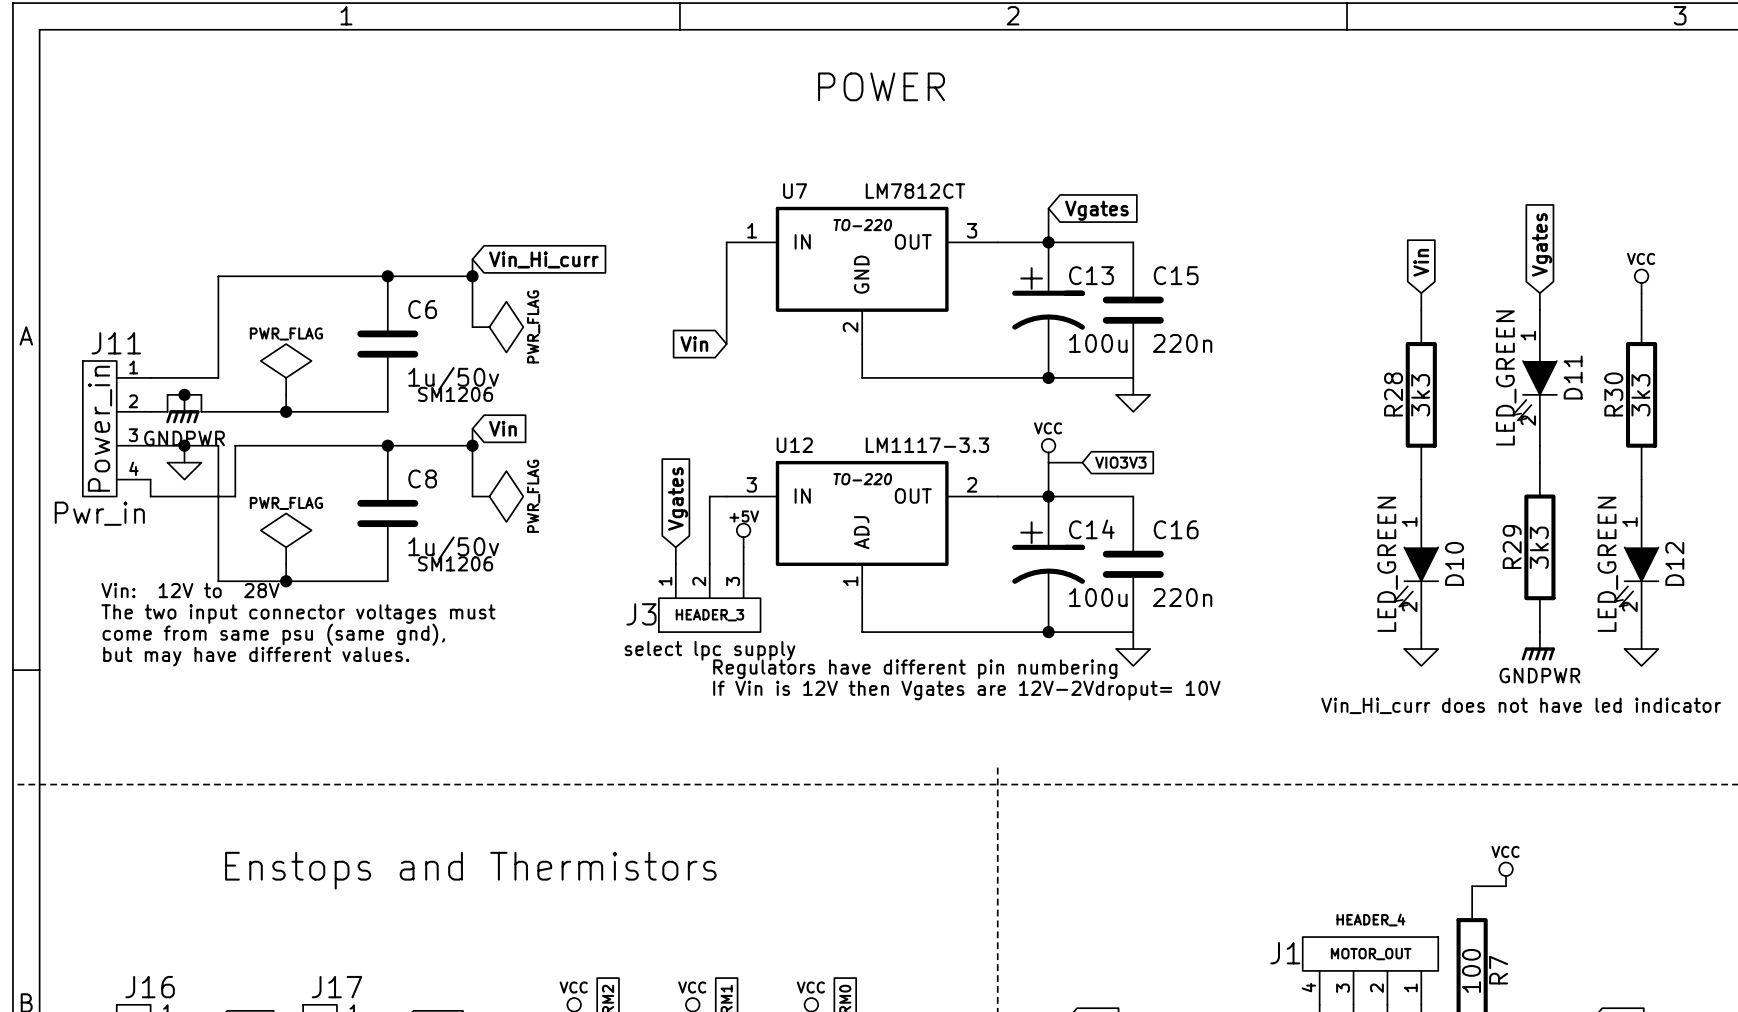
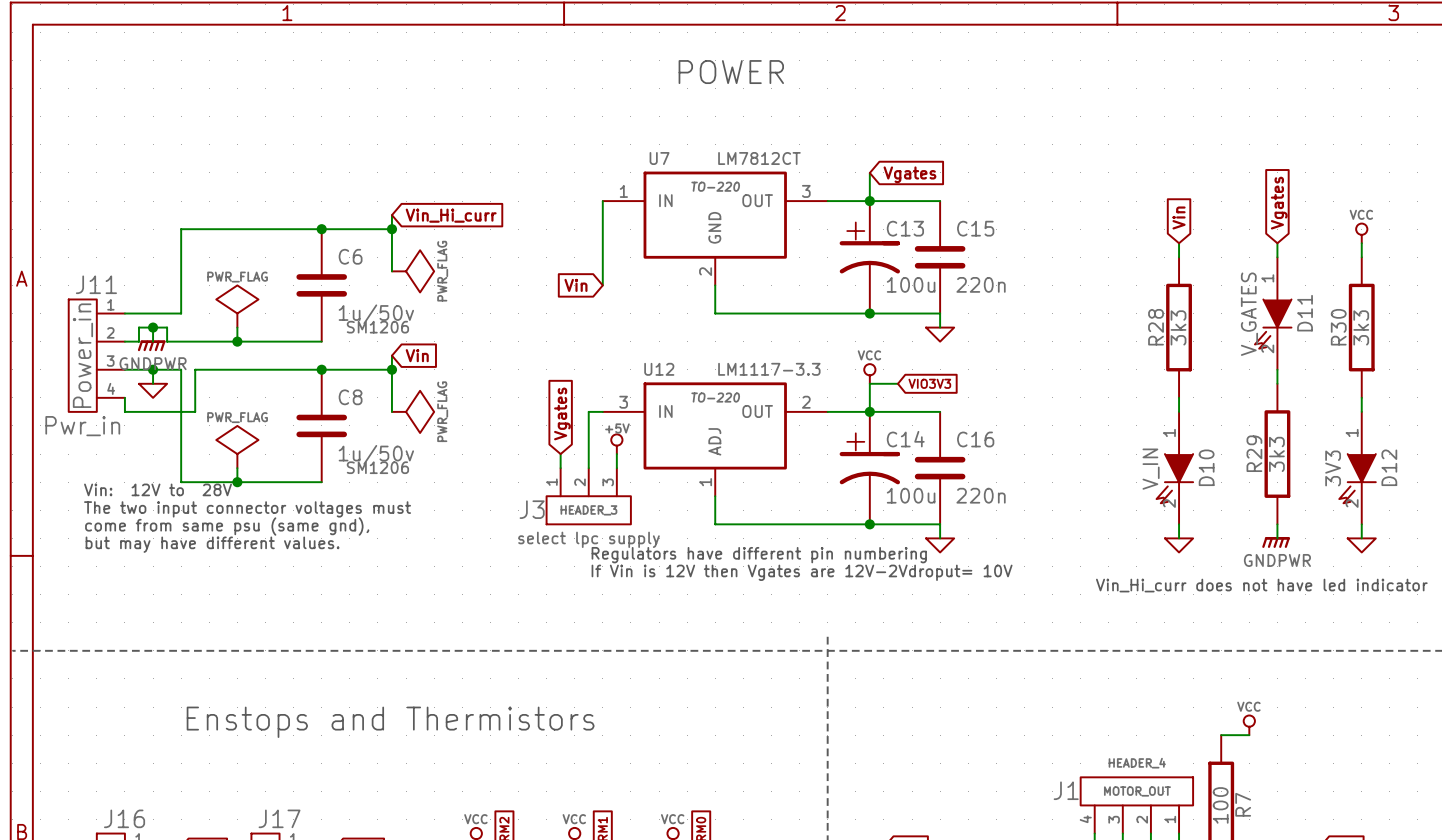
D11 value: LED_GREEN (1506, 377) -> V_GATES (1249, 314)
D10 value: LED_GREEN (1387, 564) -> V_IN (1151, 469)
D12 value: LED_GREEN (1607, 564) -> 3V3 (1333, 468)

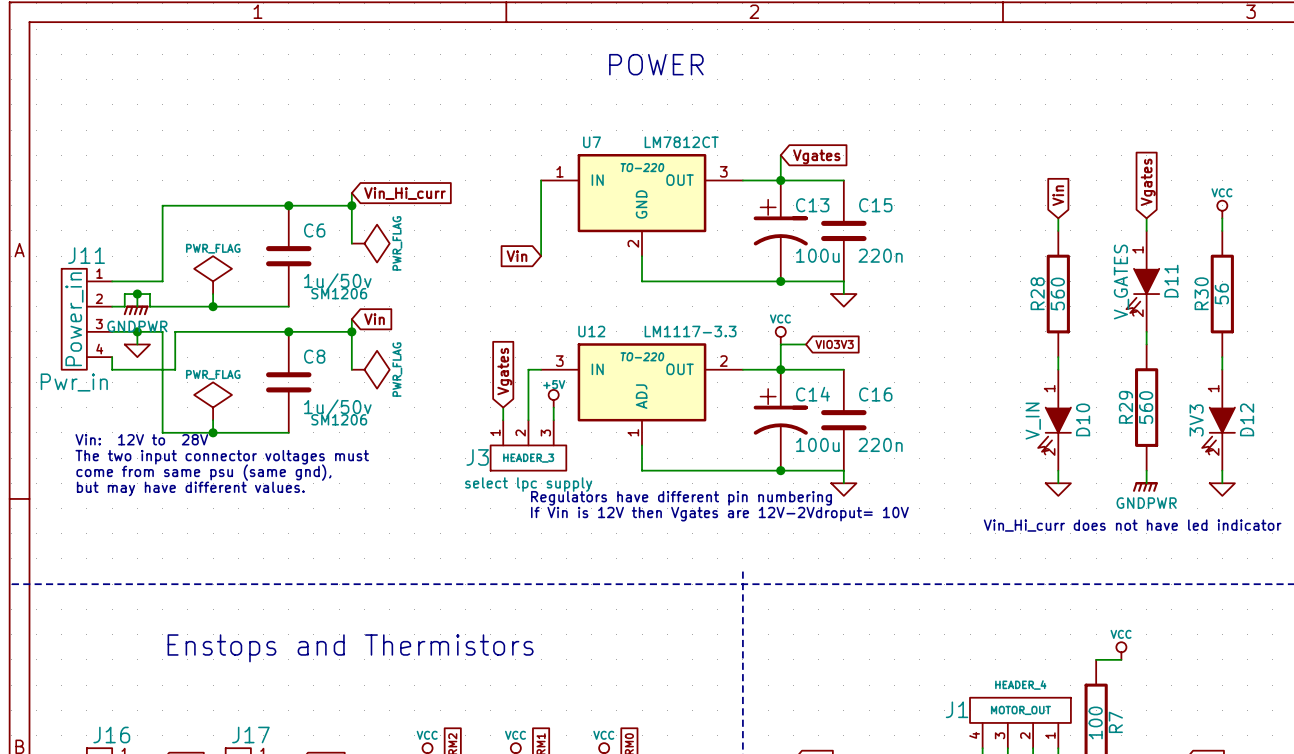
R28 value: 3k3 (1178, 327) -> 560 (1057, 294)
R30 value: 3k3 (1361, 327) -> 56 (1221, 294)
R29 value: 3k3 (1276, 454) -> 560 (1146, 407)

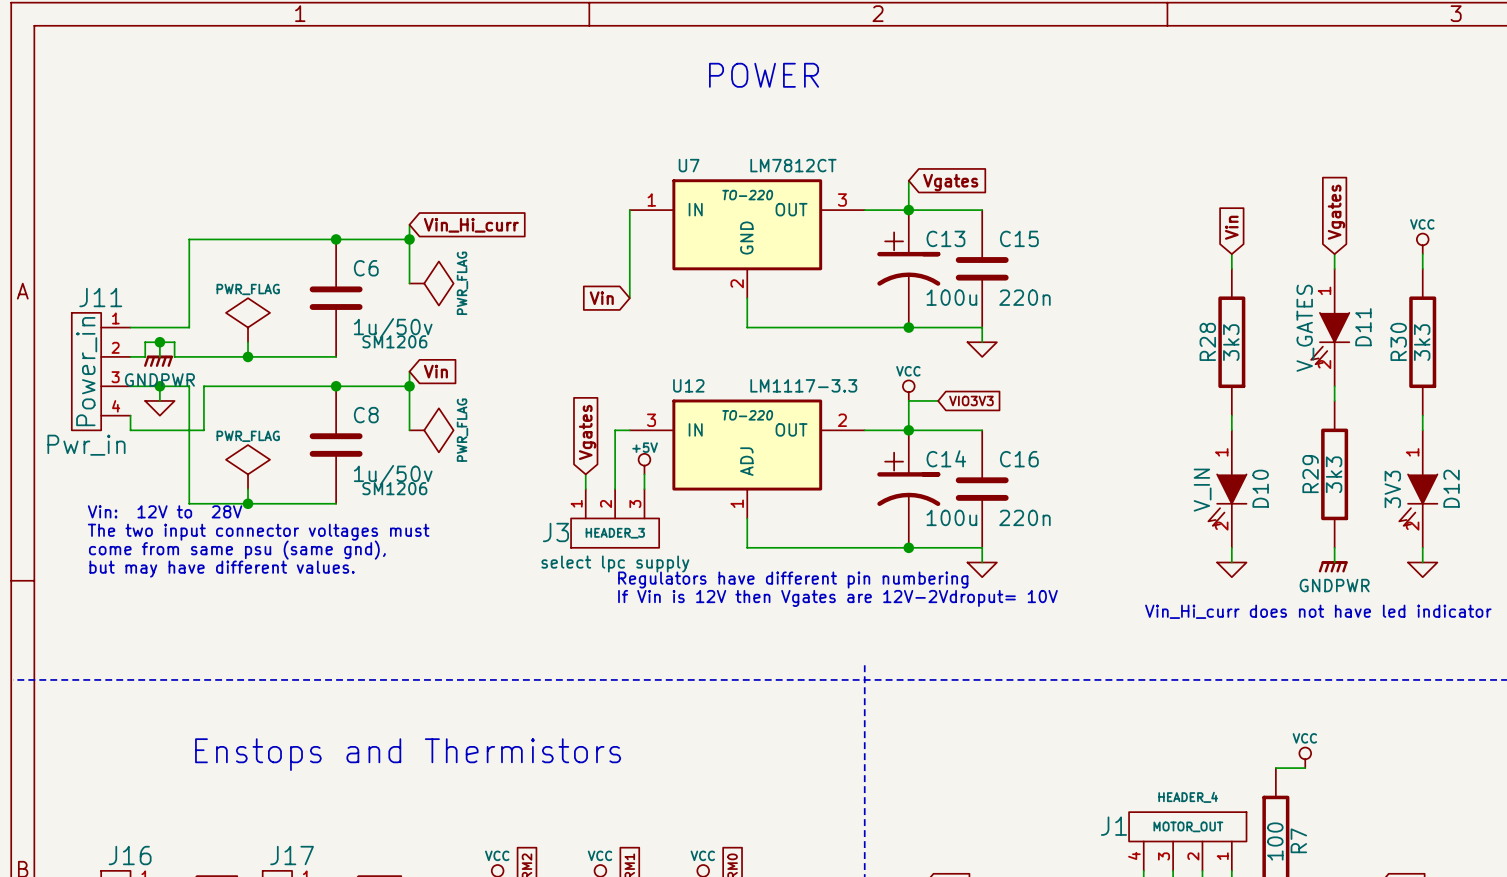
R28 value: 560 (1057, 294) -> 3k3 (1231, 342)
R30 value: 56 (1221, 294) -> 3k3 (1422, 342)
R29 value: 560 (1146, 407) -> 3k3 (1334, 474)

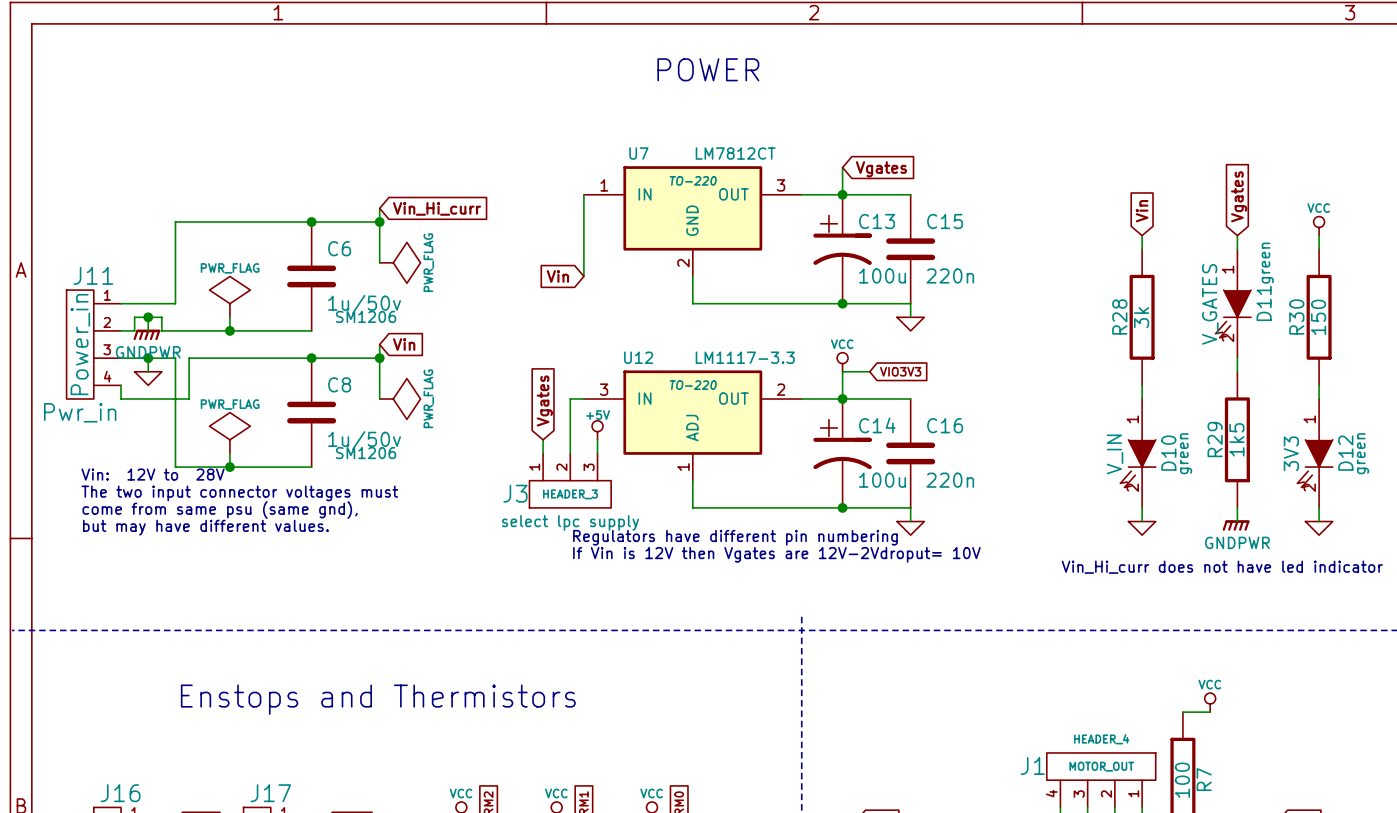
D11 text: none -> green (1267, 263)
R28 value: 3k3 (1231, 342) -> 3k (1141, 317)
R30 value: 3k3 (1422, 342) -> 150 (1318, 317)
R29 value: 3k3 (1334, 474) -> 1k5 (1236, 439)
D10 text: none -> green (1186, 453)
D12 text: none -> green (1363, 453)

